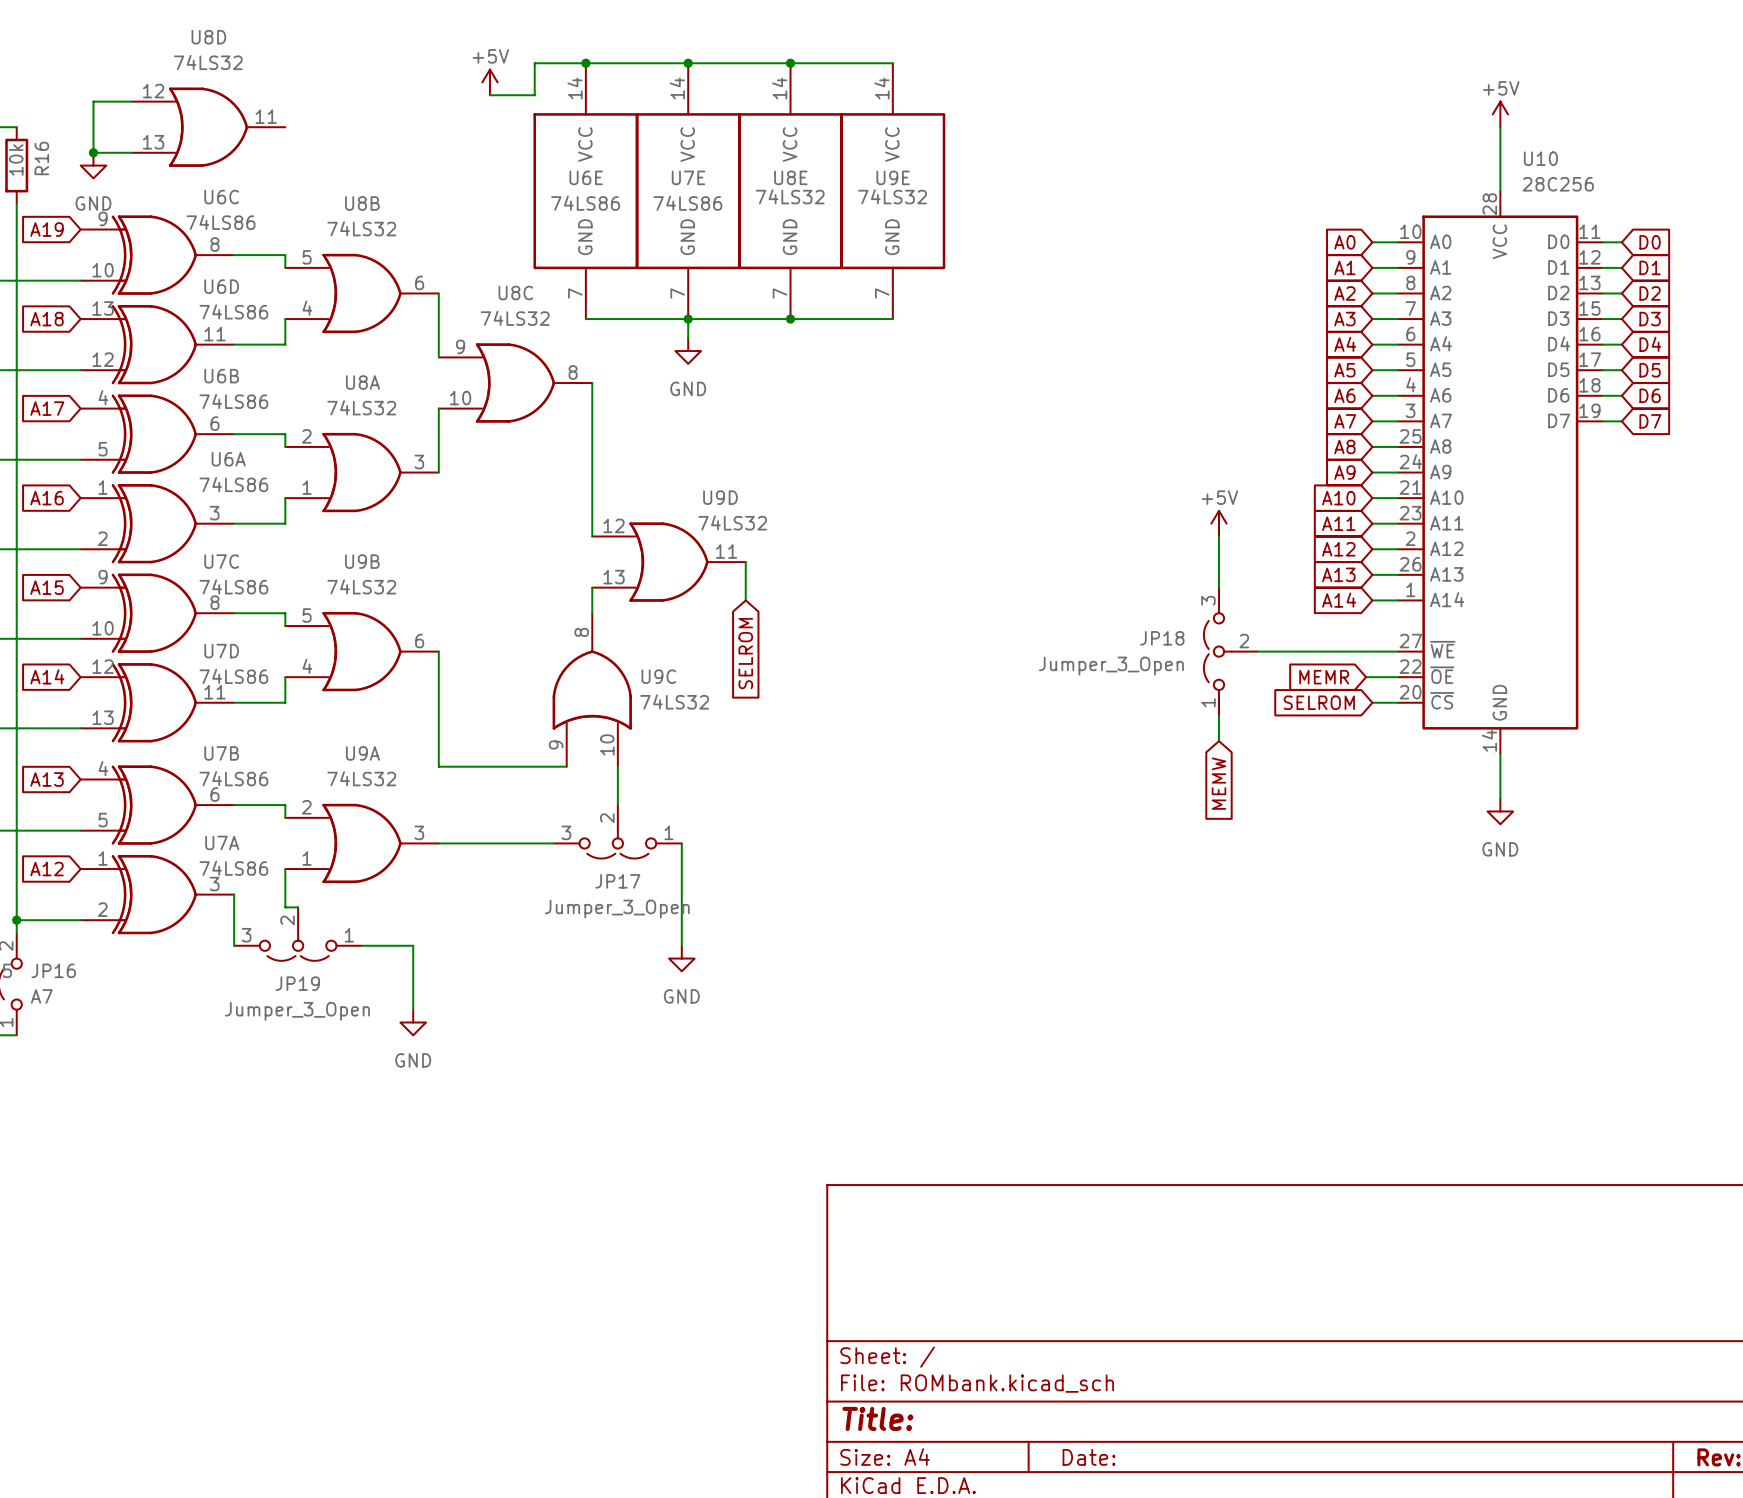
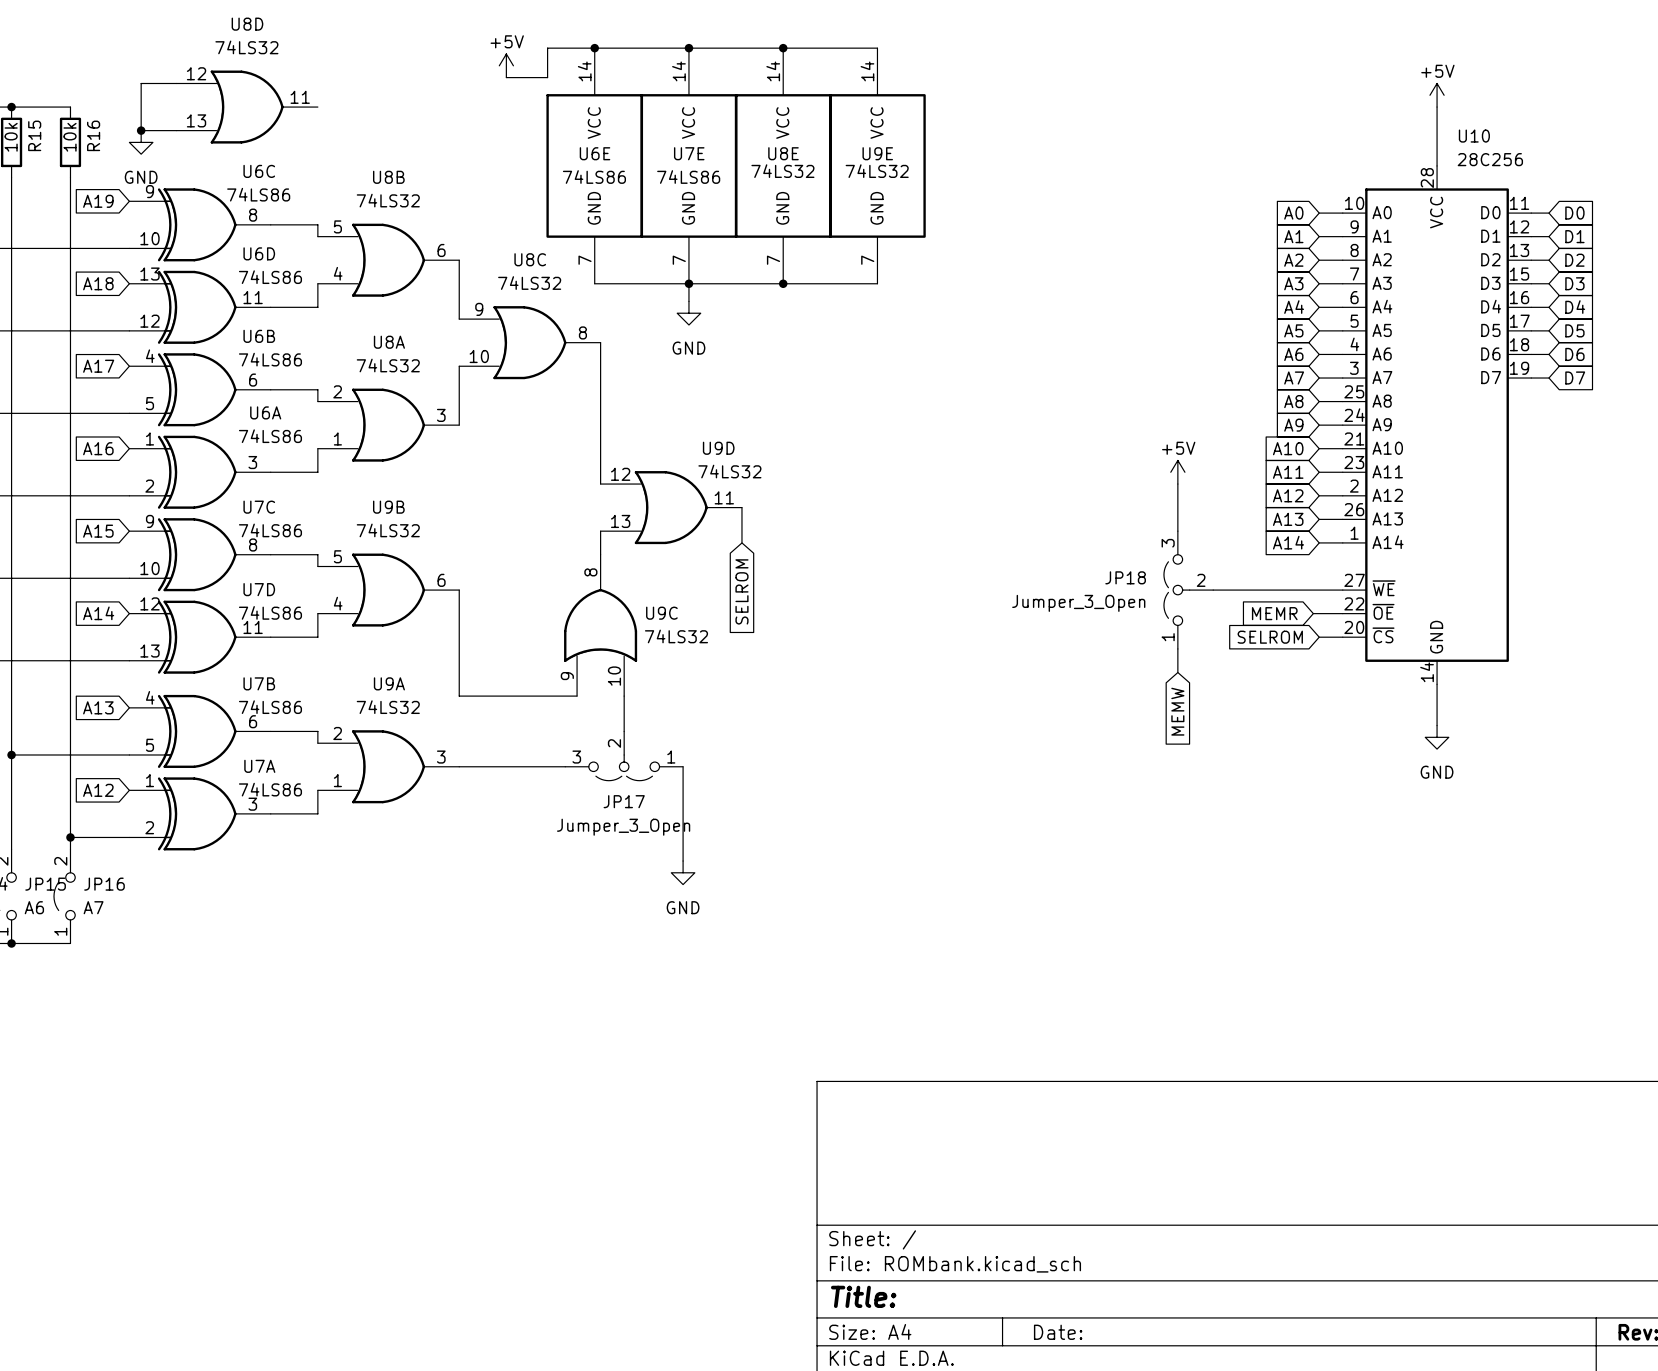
wire: (234, 894) (234, 945) -> none
wire: (285, 894) (285, 907) (298, 907) -> (317, 813) (270, 813)
JP19: Jumper_3_Open (298, 934) -> none
wire: (362, 945) (413, 945) (413, 1009) -> none
power symbol: GND (413, 1022) -> none

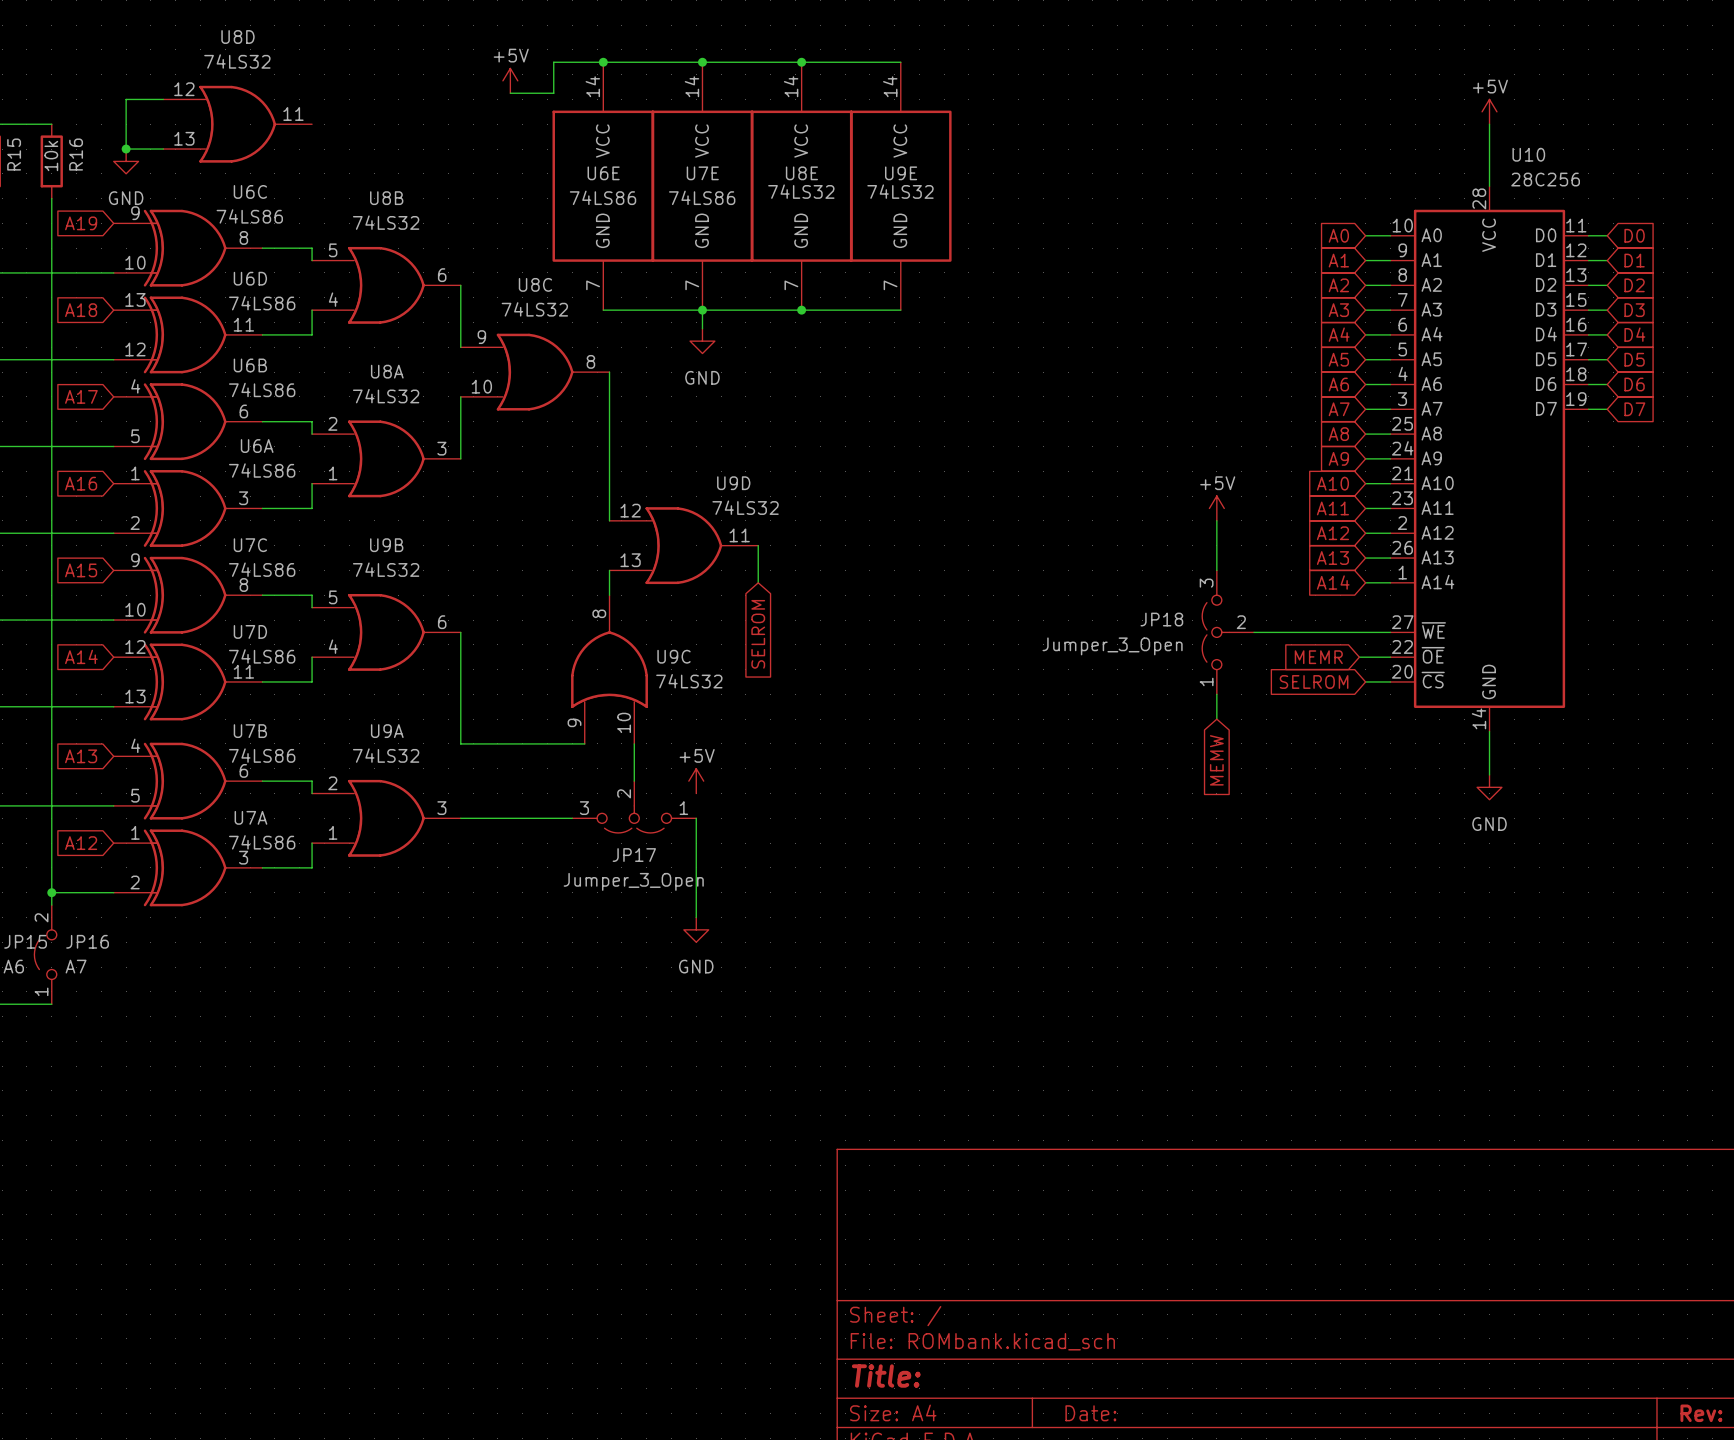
power symbol: none -> +5V (696, 781)

